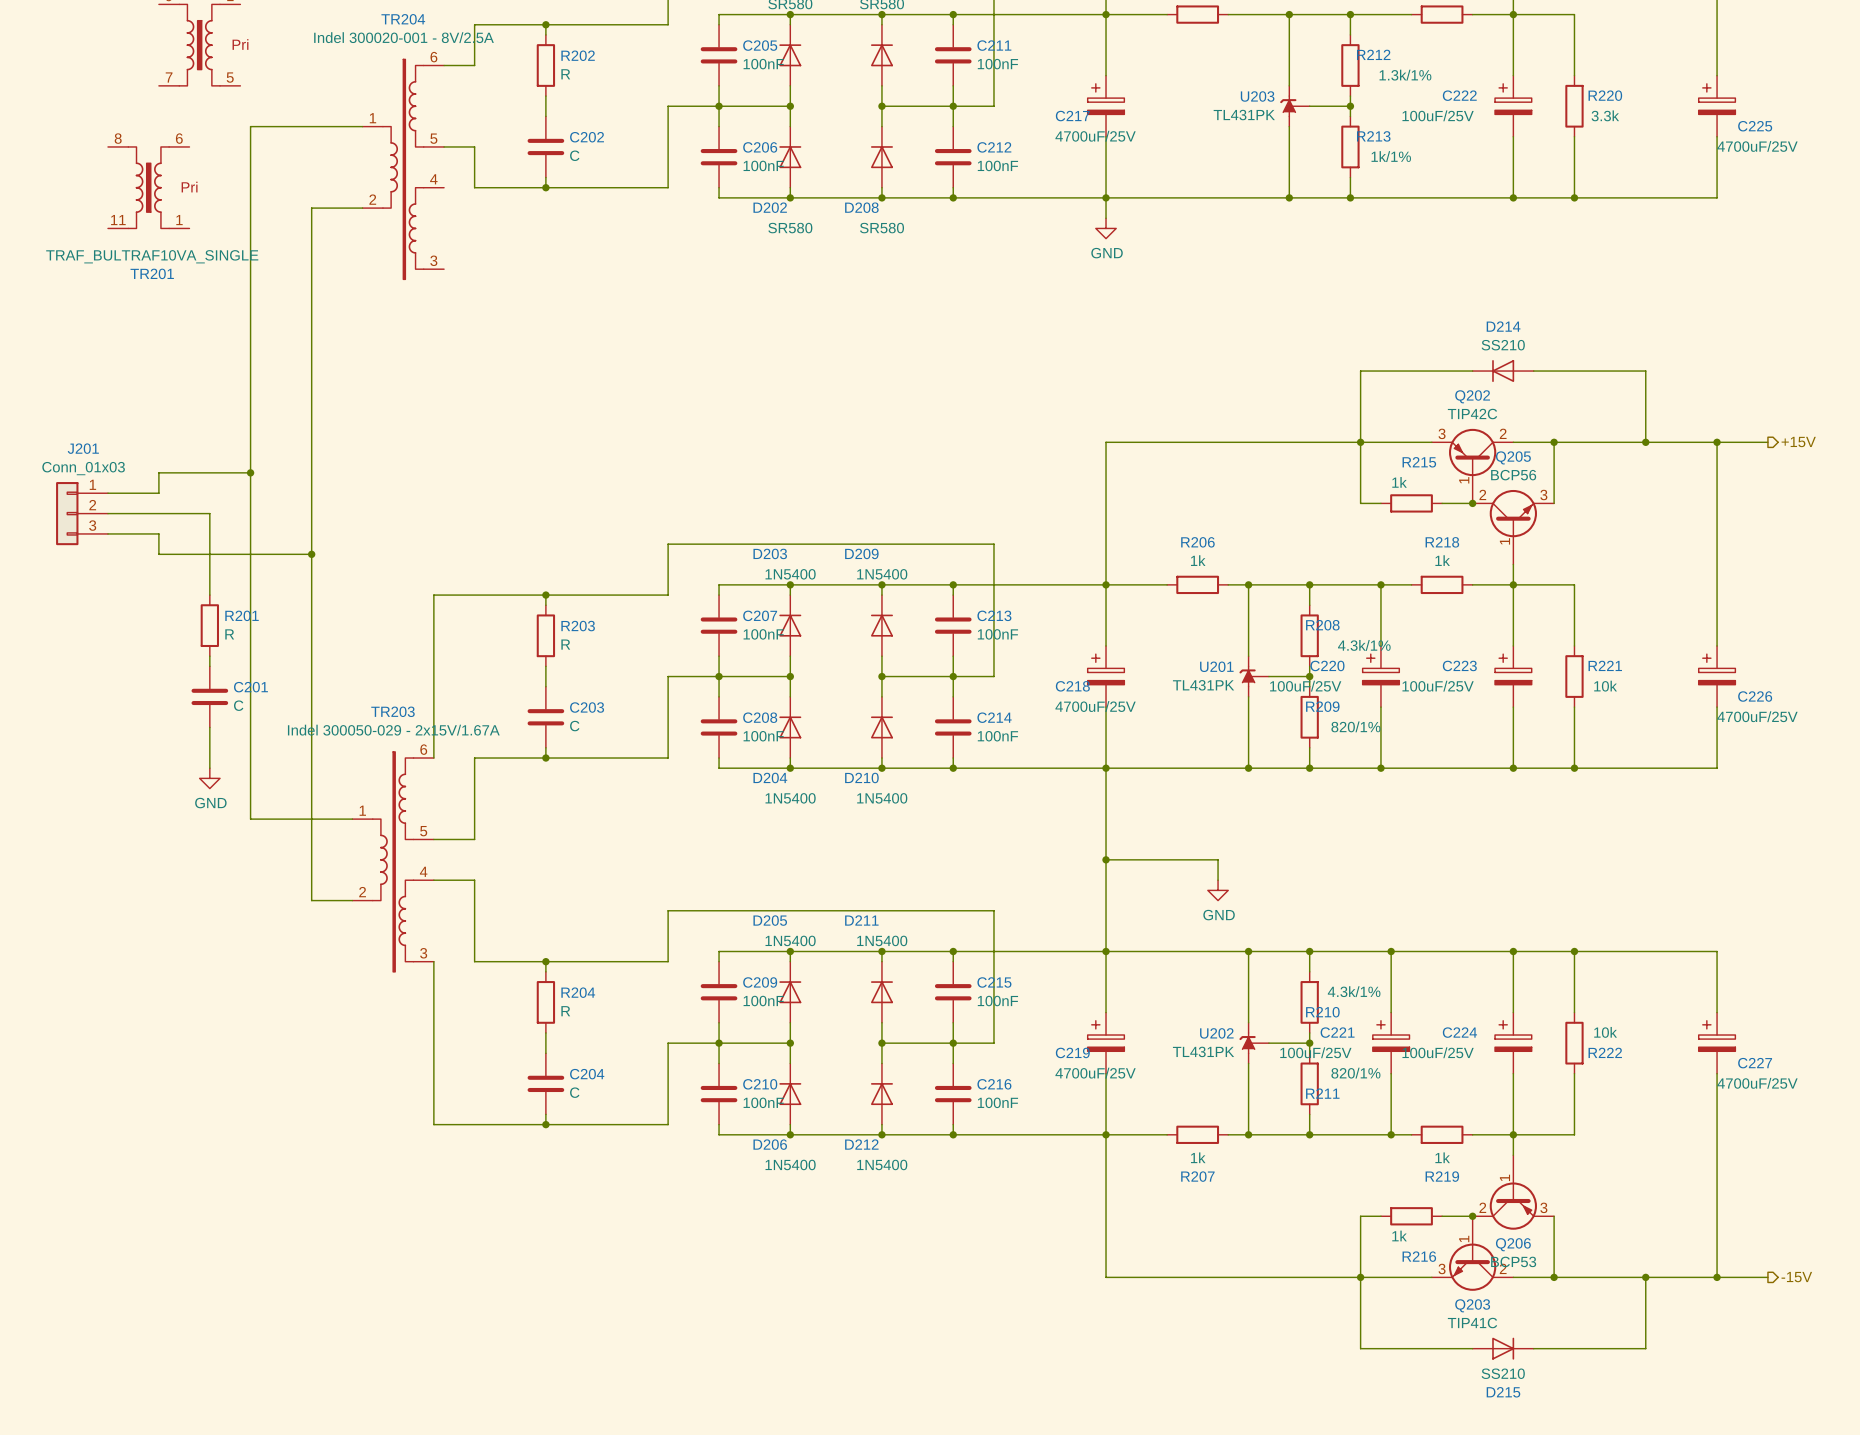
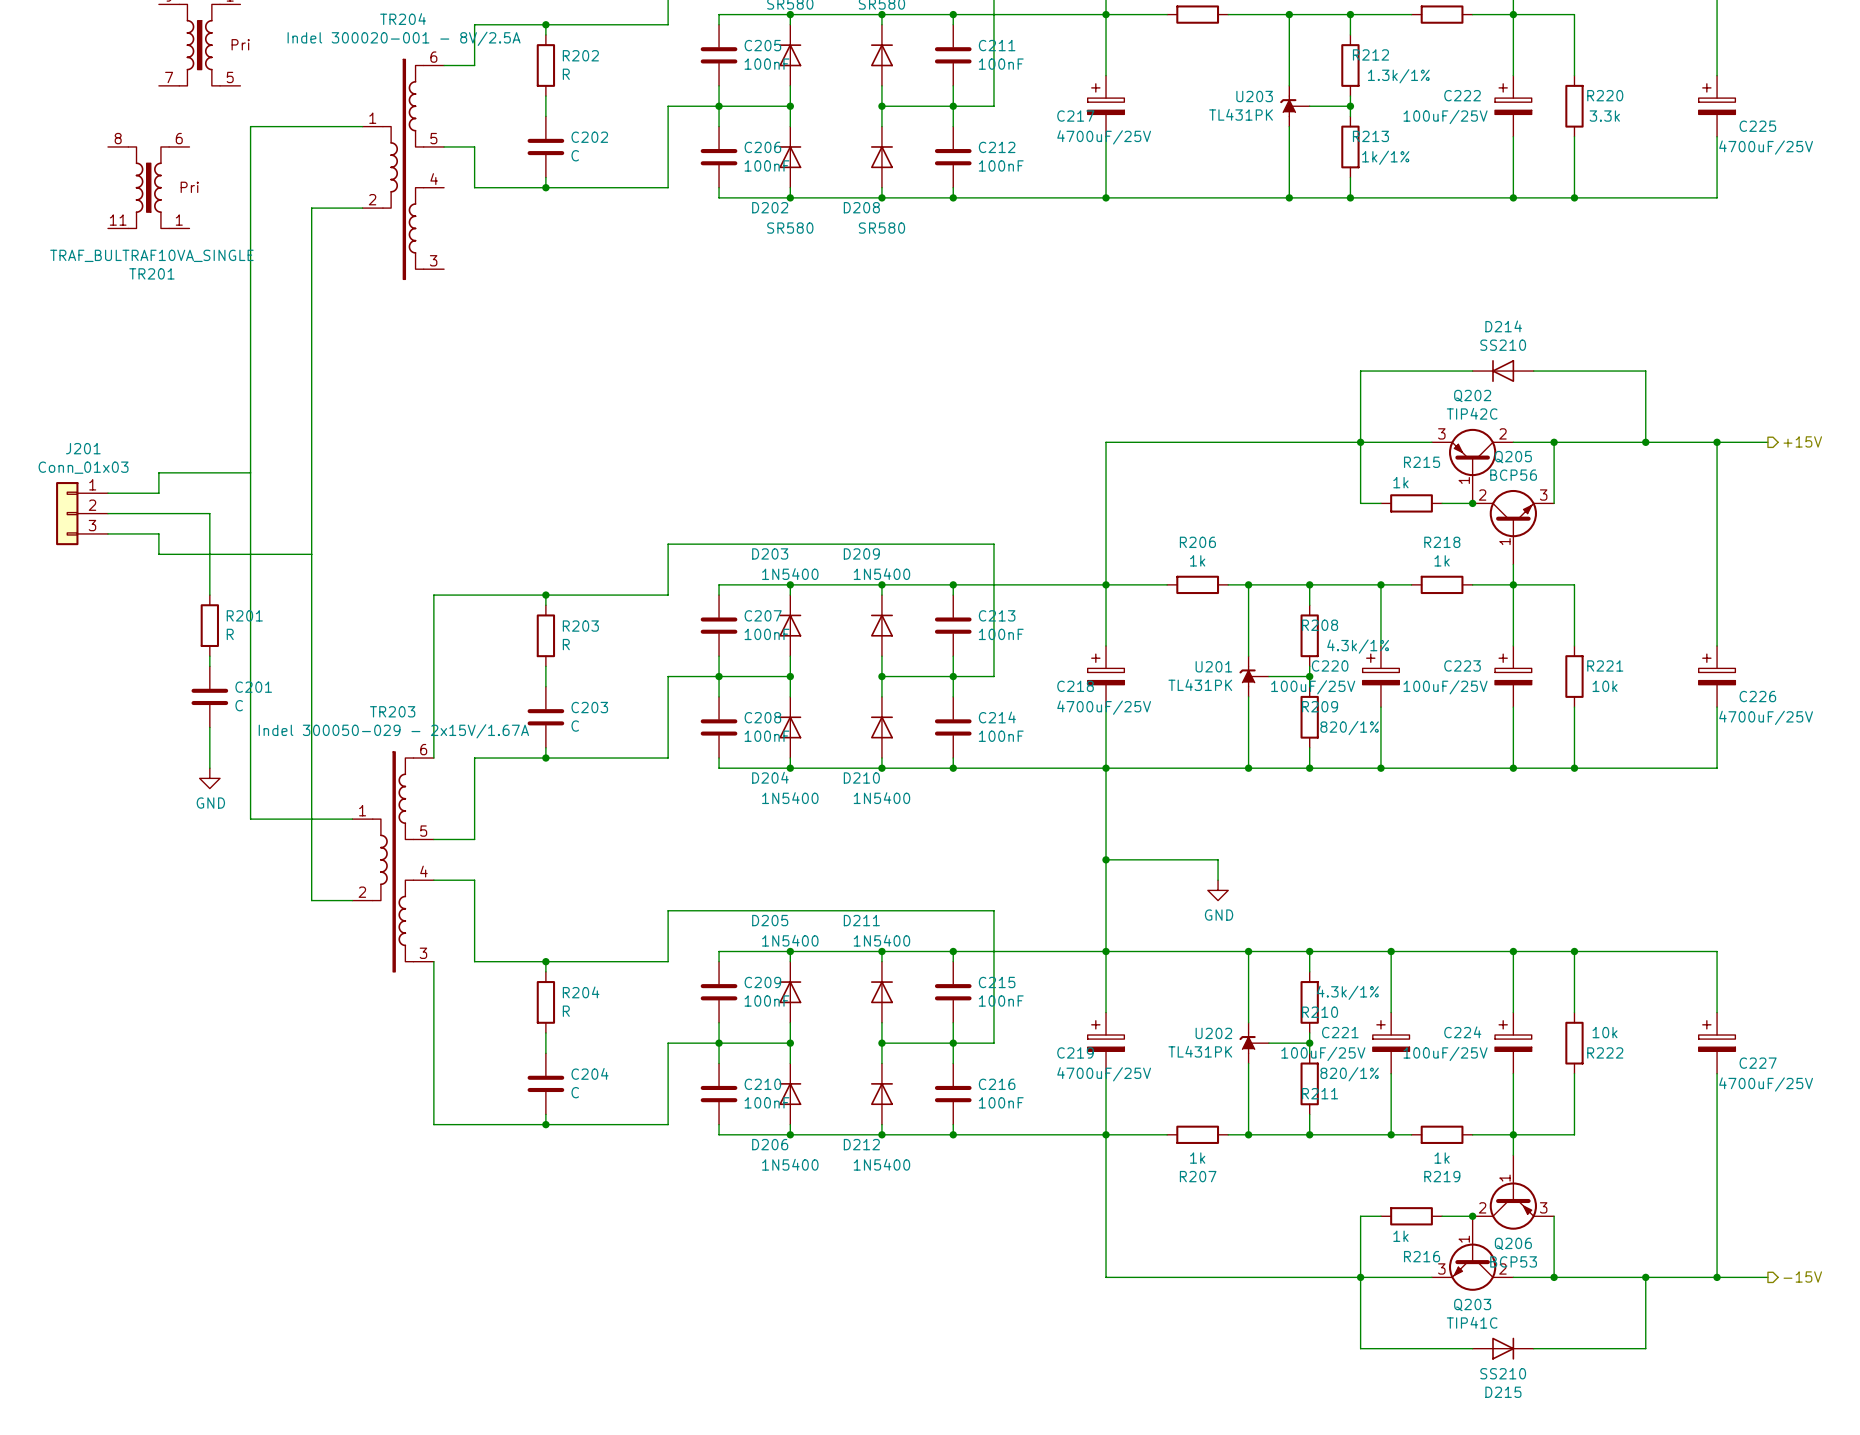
wire: (1106, 197) (1106, 218) -> none
power symbol: GND (1106, 228) -> none
junction: (250, 472) -> none
junction: (311, 554) -> none

